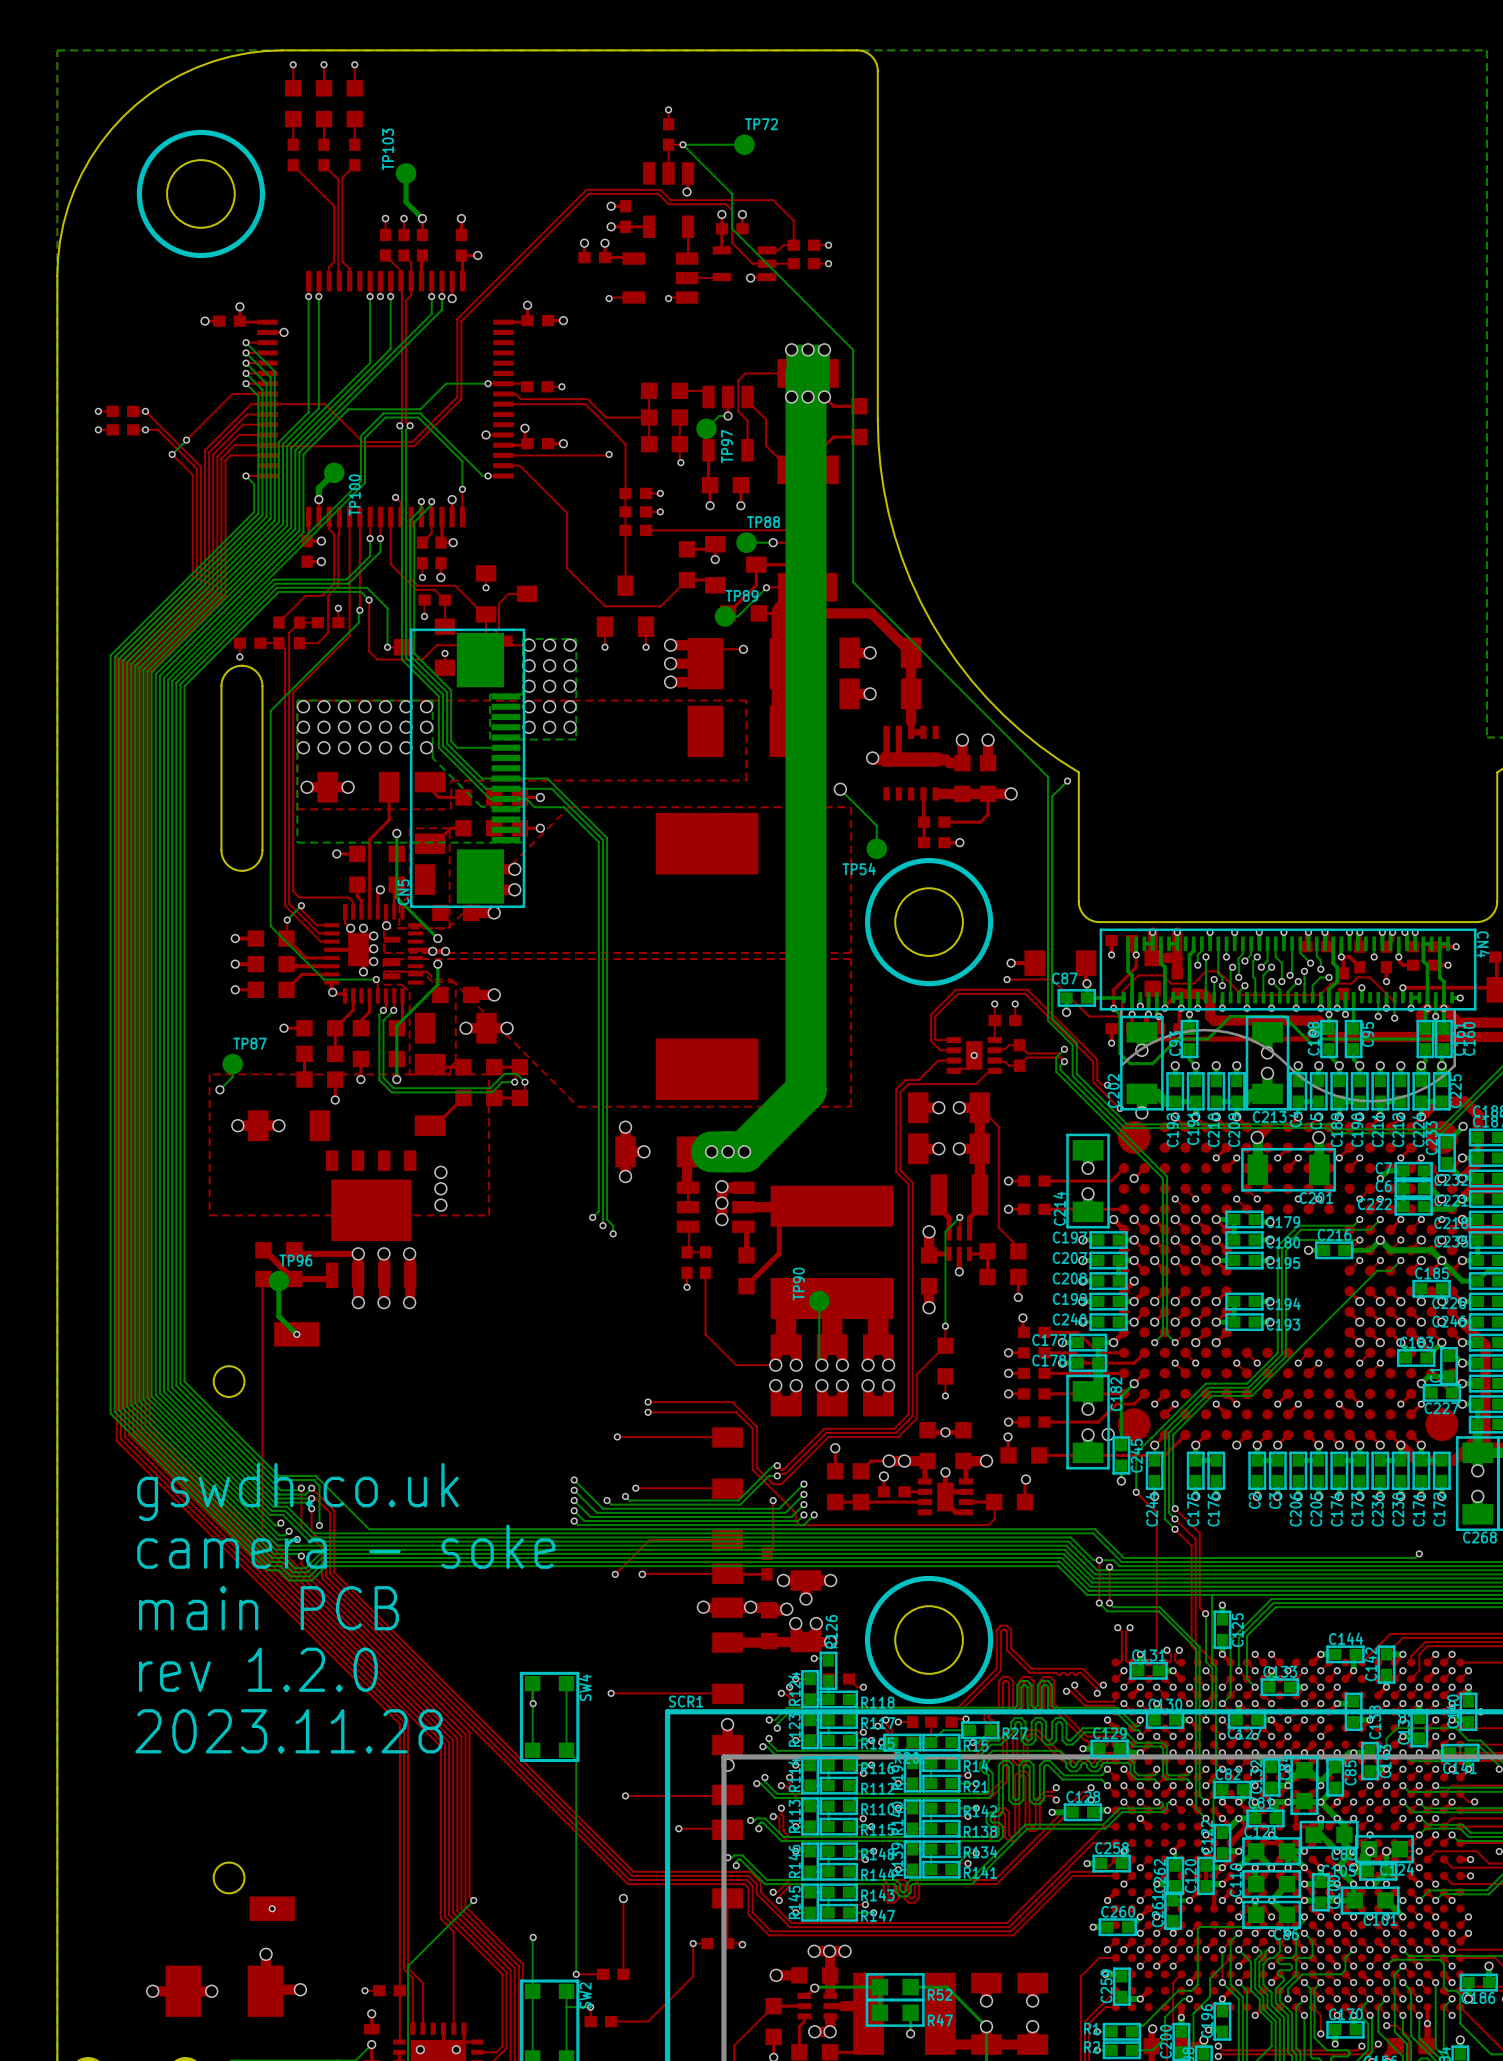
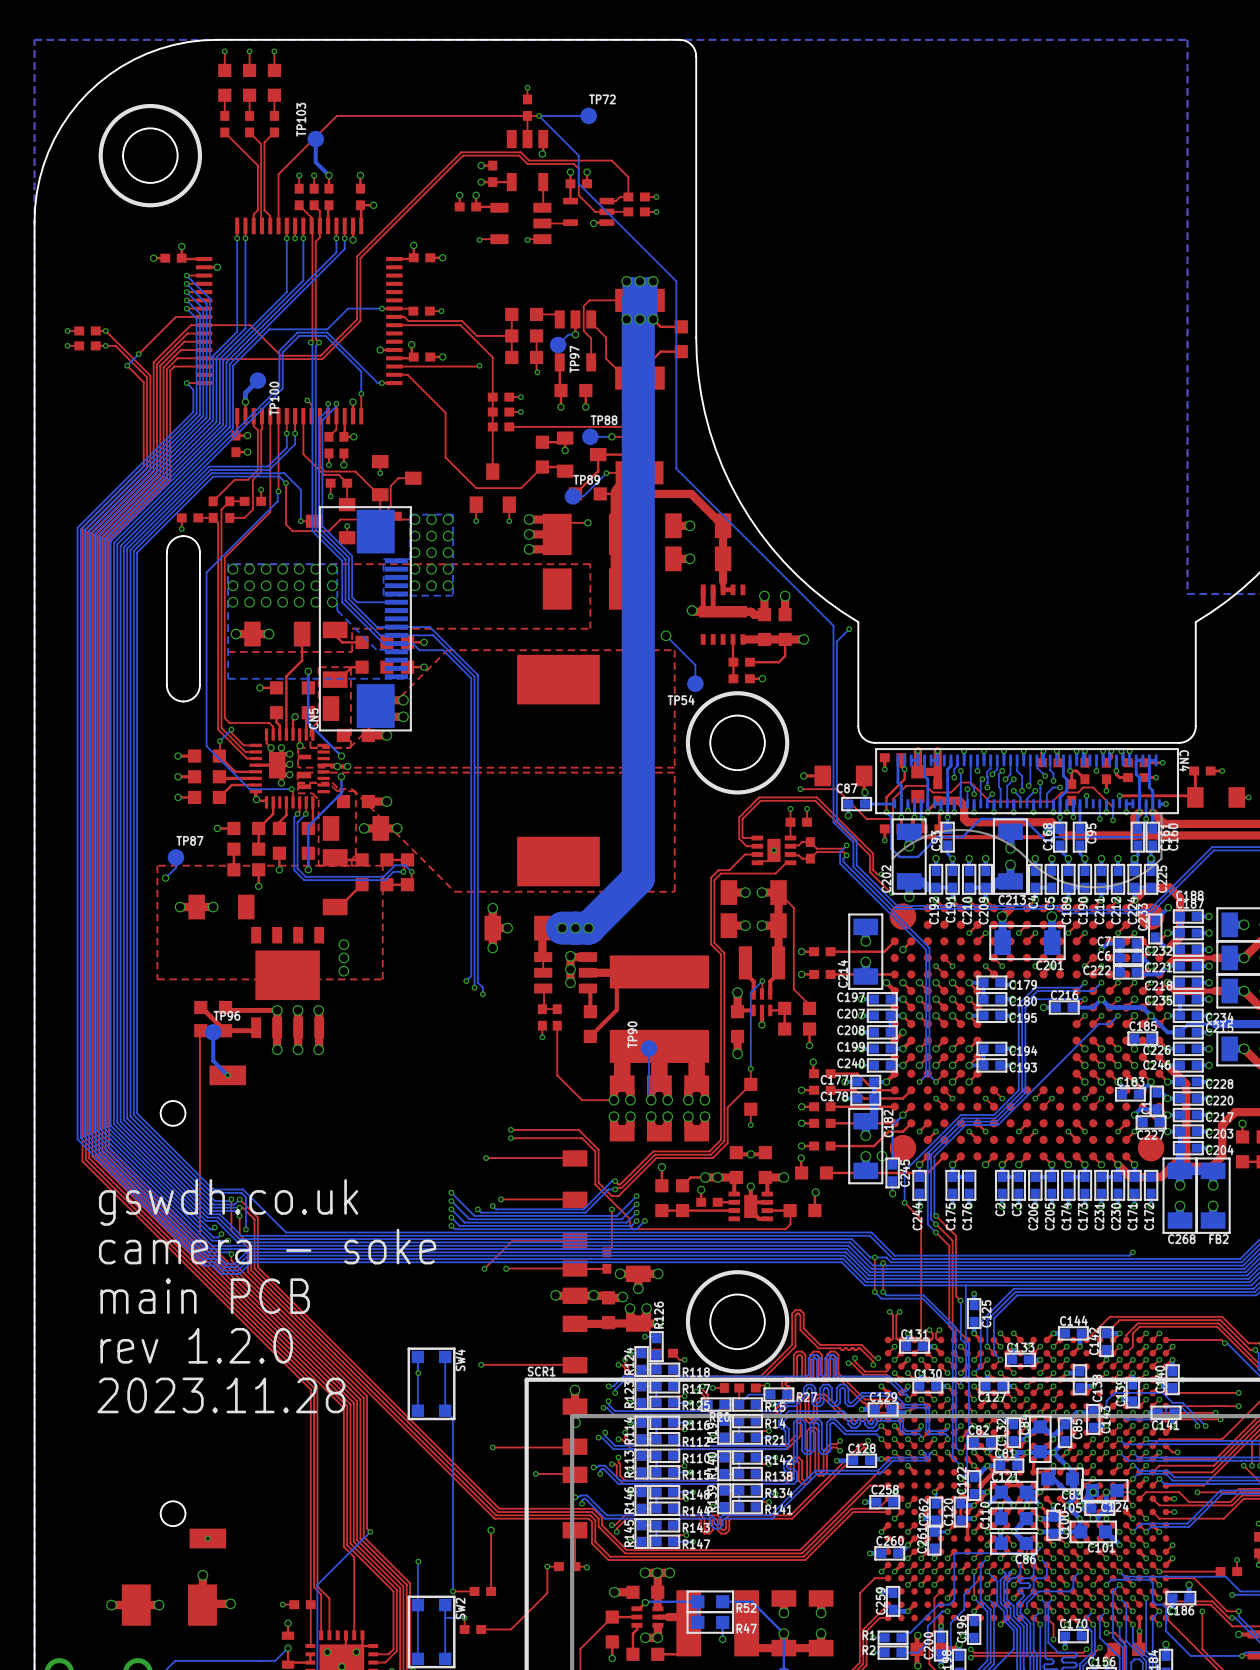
top track: none -> (527, 115) (336, 115) (278, 174) (278, 225)

